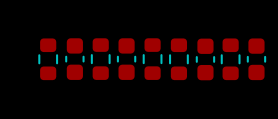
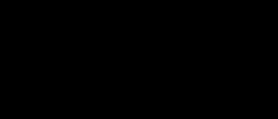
part: (48, 59) -> none
part: (74, 59) -> none
part: (100, 59) -> none
part: (126, 59) -> none
part: (152, 59) -> none
part: (178, 59) -> none
part: (205, 59) -> none
part: (230, 59) -> none
part: (256, 59) -> none

